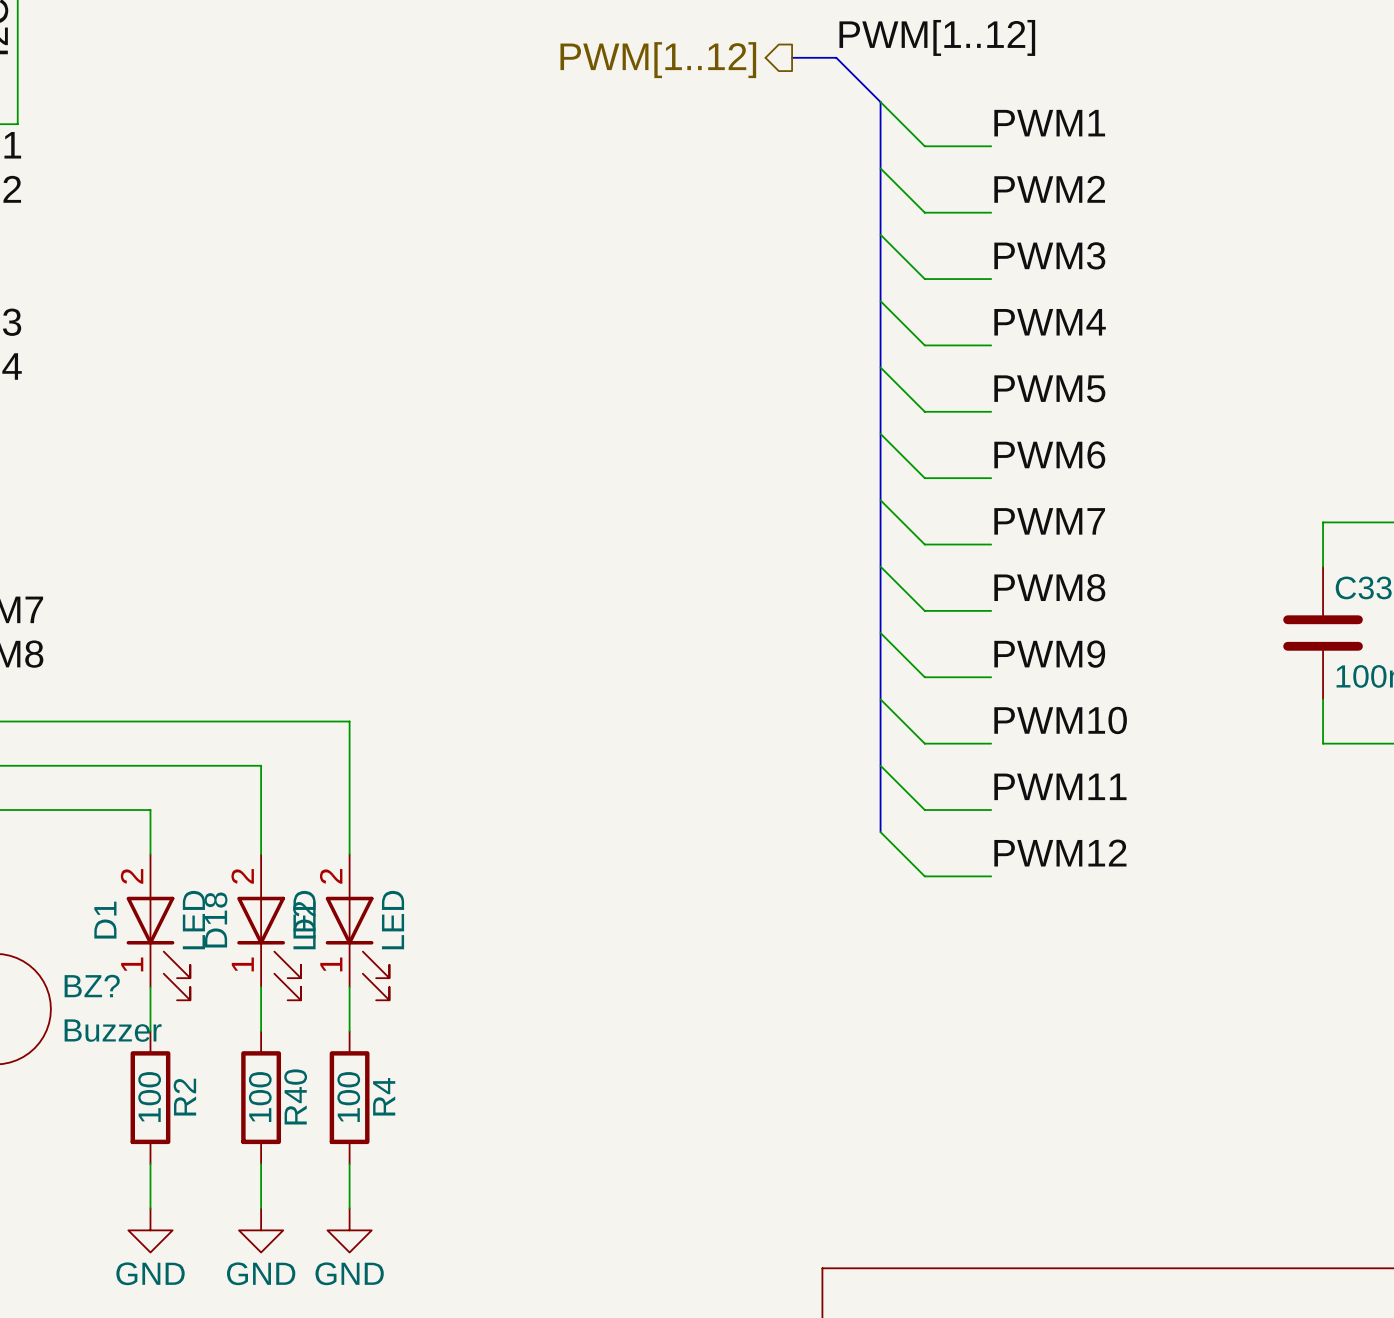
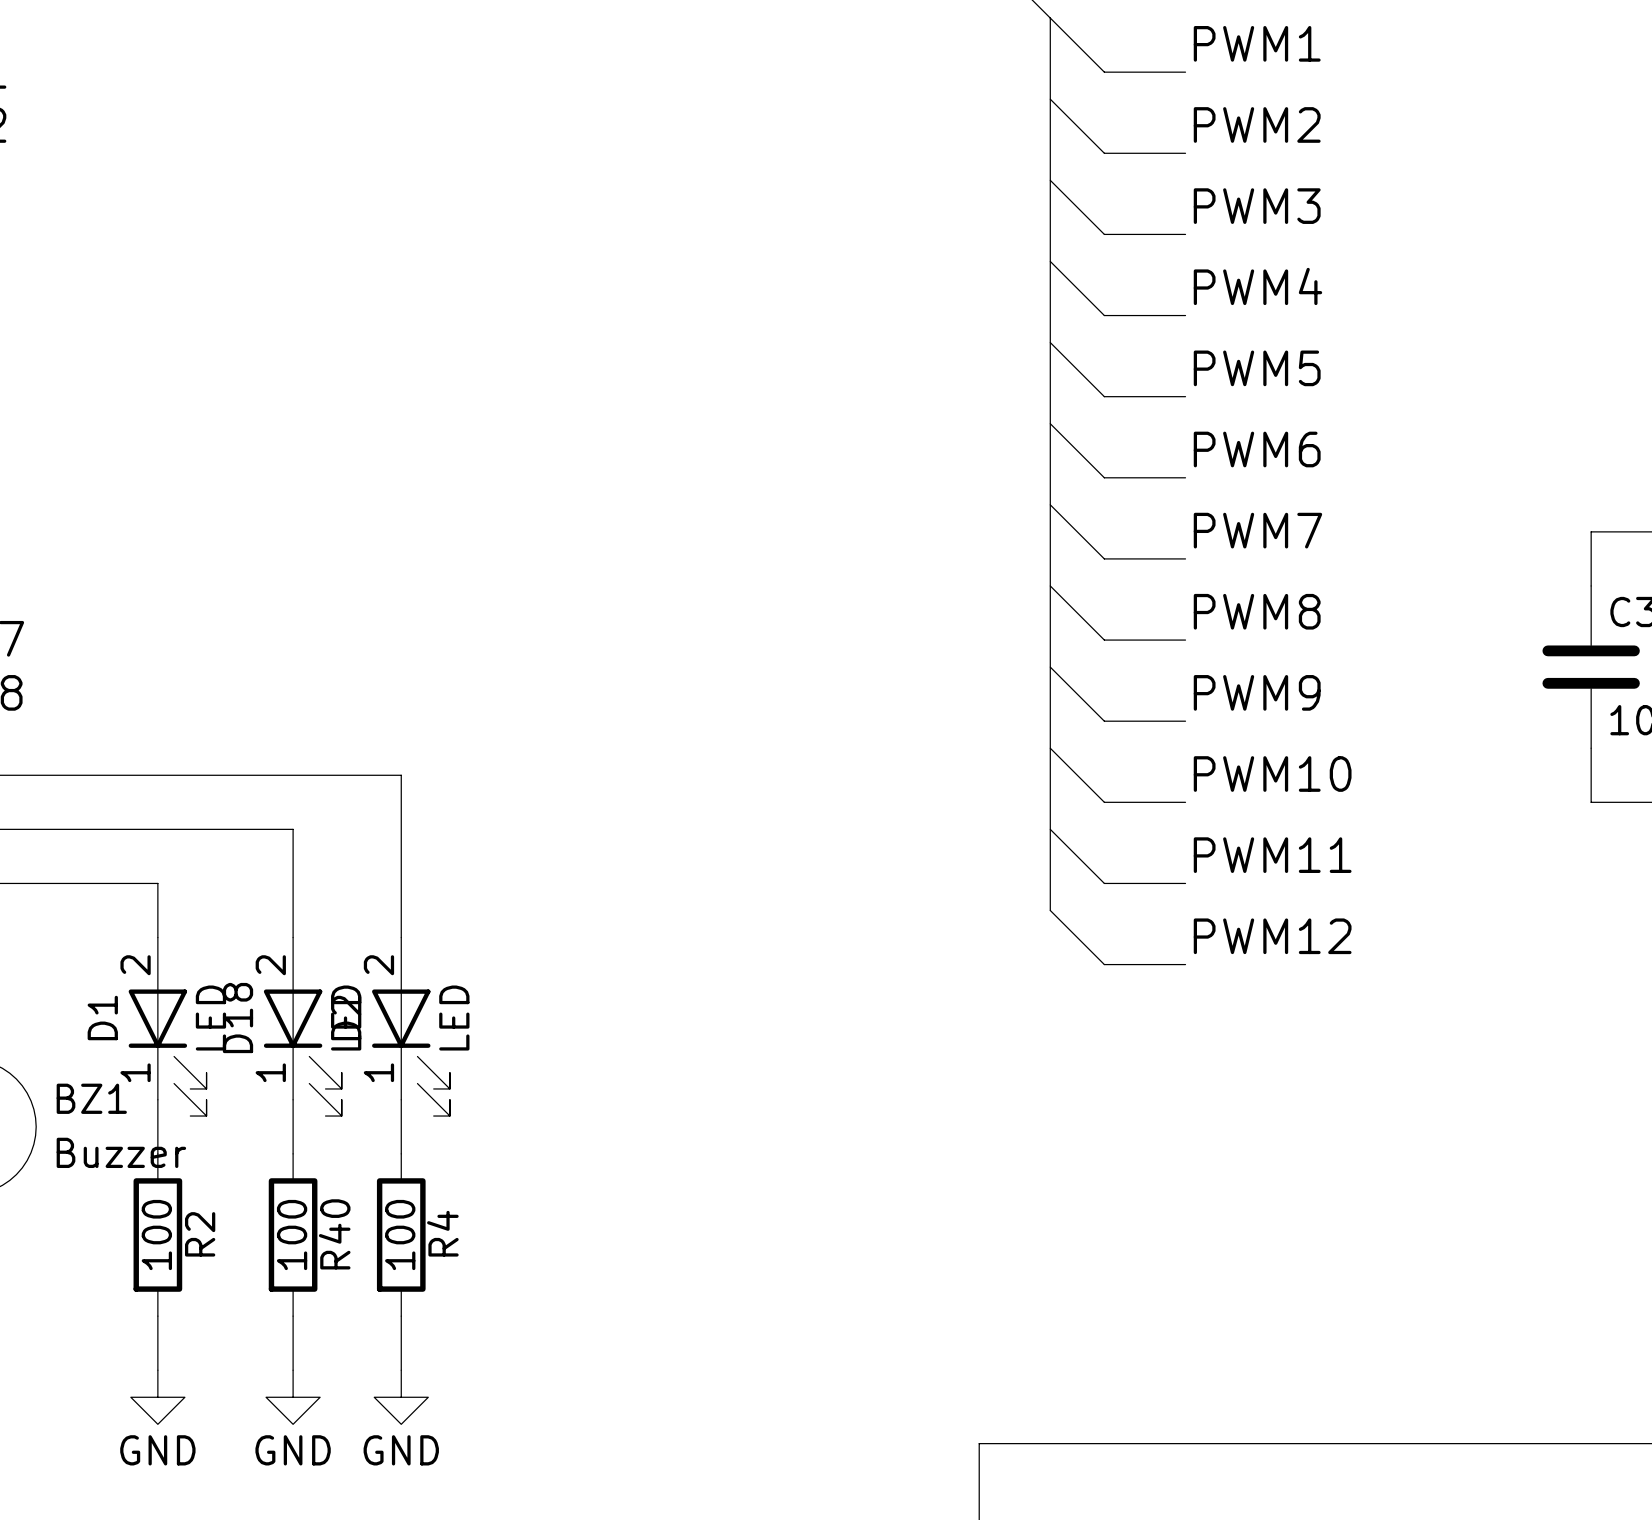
BZ? name: BZ? (92, 986) -> BZ1 (91, 1098)

